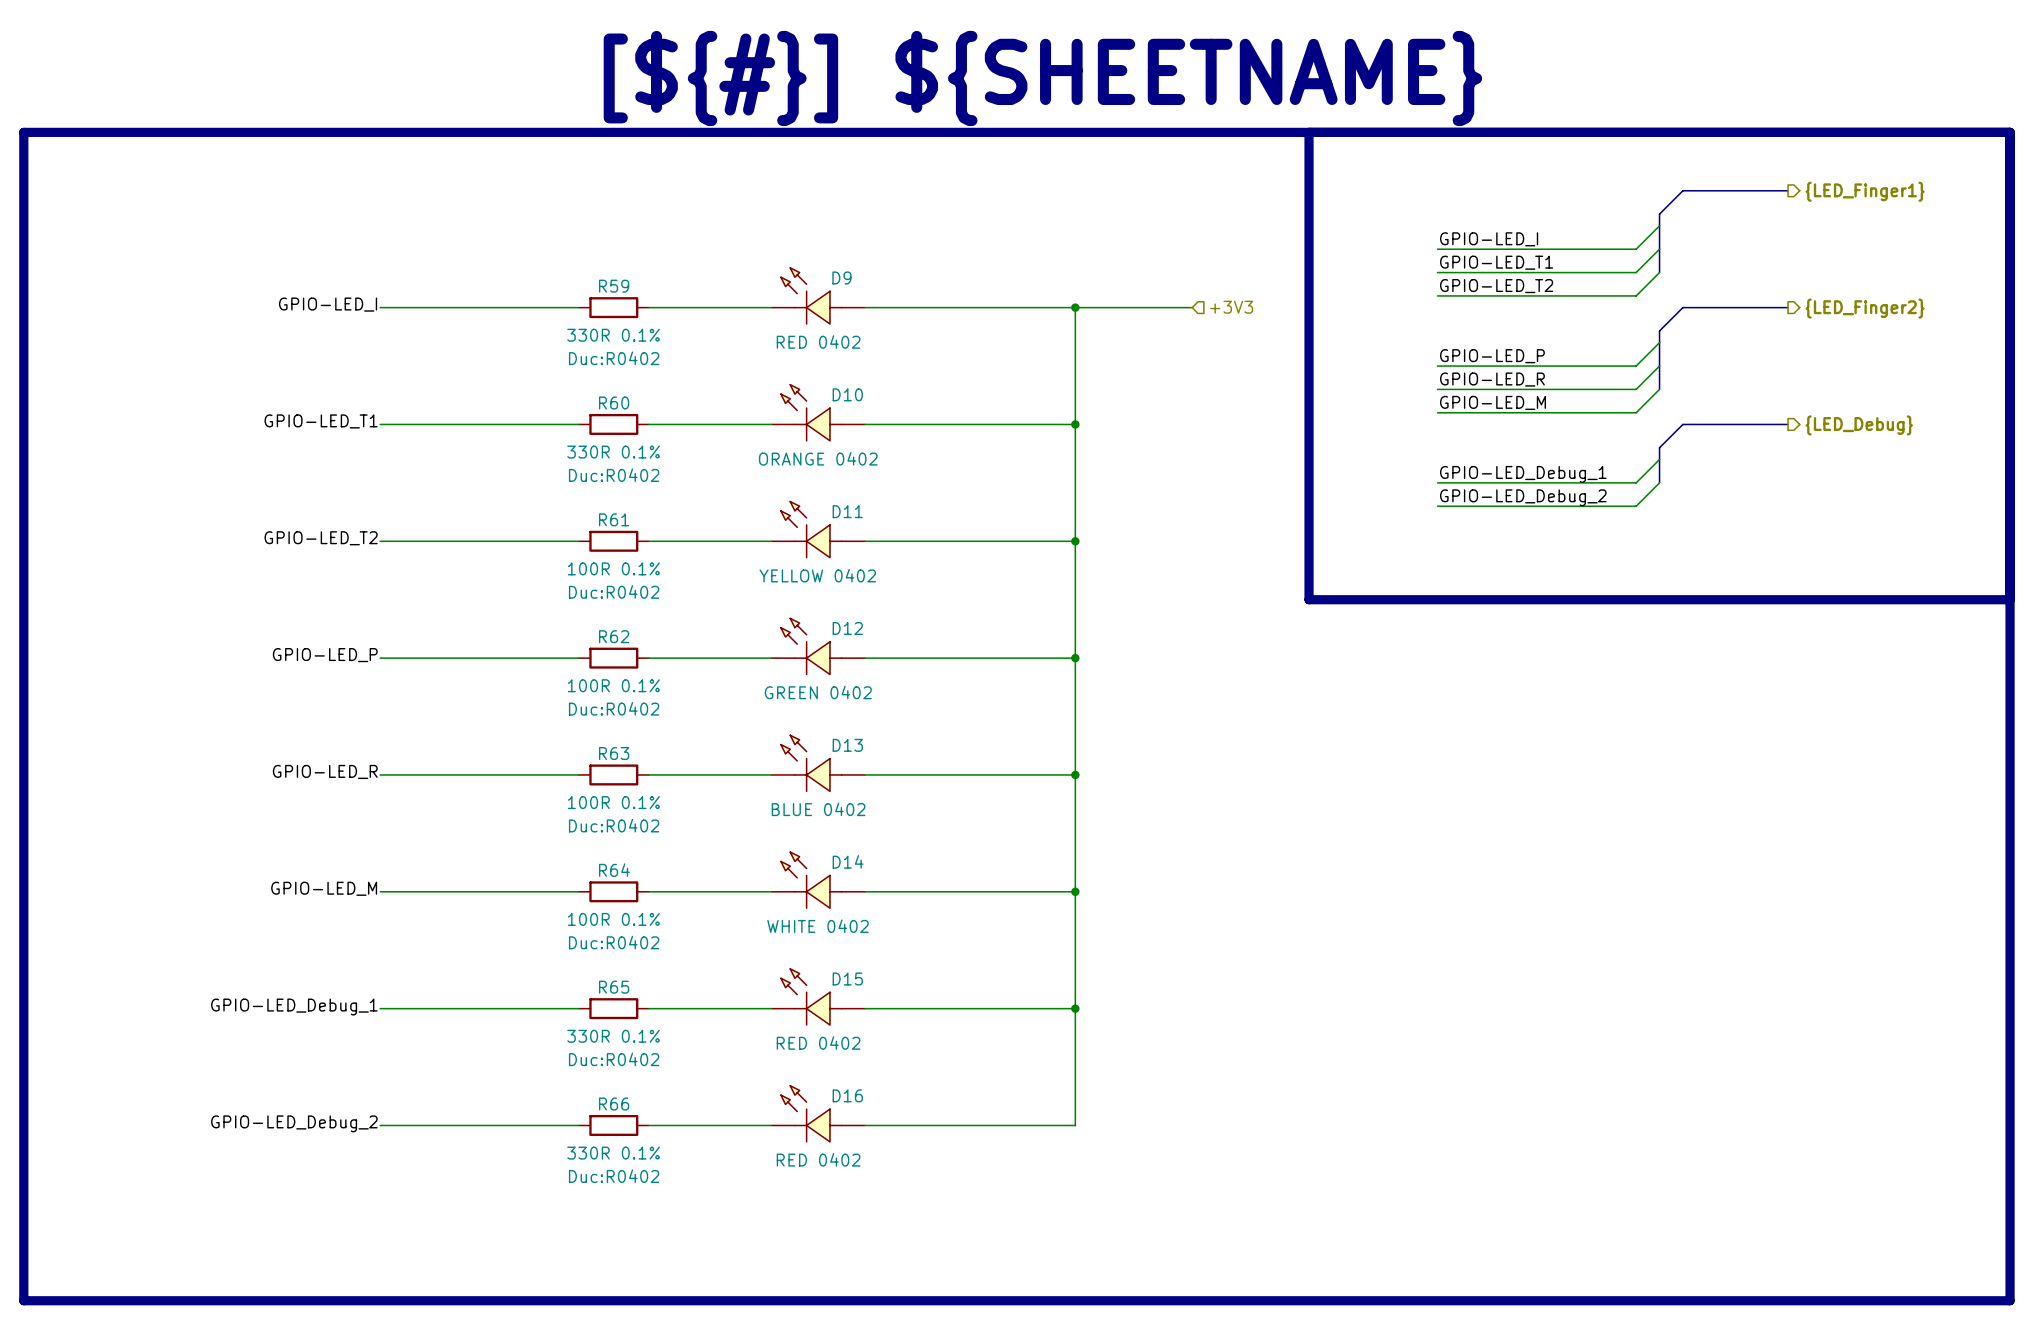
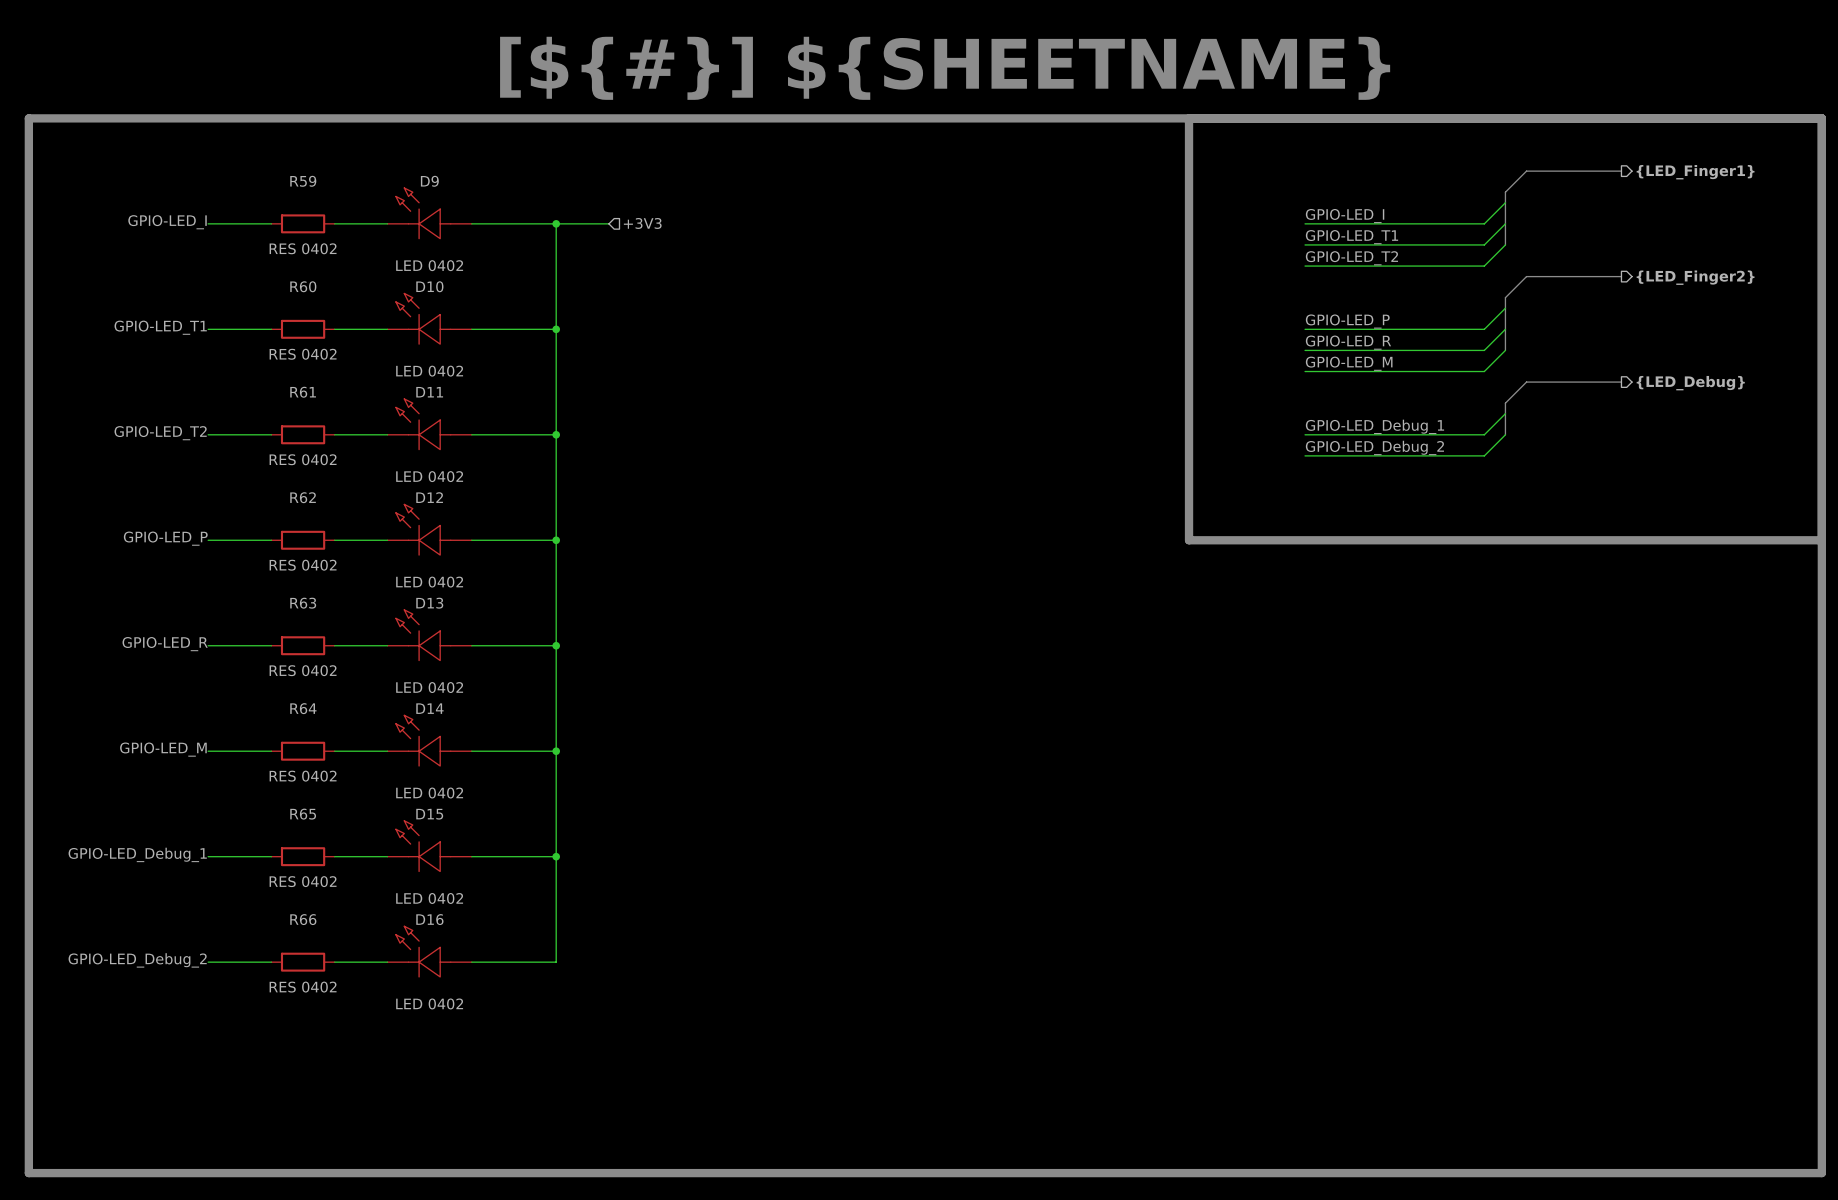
hierarchical label: none -> +3V3 (642, 223)
wire: none -> (208, 223) (271, 223)
wire: none -> (334, 223) (387, 223)
wire: none -> (471, 223) (608, 223)
wire: none -> (556, 223) (556, 962) (471, 962)
junction: none -> (556, 223)
D9 name position: D9 (841, 277) -> D9 (429, 181)
R59 name position: R59 (614, 286) -> R59 (303, 181)
D9 position: (818, 295) -> (429, 213)
label position: GPIO-LED_I (328, 304) -> GPIO-LED_I (167, 222)
wire: (380, 307) (578, 307) -> none
R59 position: (613, 307) -> (303, 223)
wire: (648, 307) (771, 307) -> none
wire: (865, 307) (1192, 307) -> none
wire: (1075, 307) (1075, 1125) (865, 1125) -> none
junction: (1075, 307) -> none
hierarchical label: +3V3 (1231, 307) -> none
R59 value: 330R 0.1% (613, 335) -> RES 0402 (303, 248)
D9 value: RED 0402 (818, 341) -> LED 0402 (429, 265)
R59 text: Duc:R0402 (614, 358) -> none
wire: none -> (208, 329) (271, 329)
wire: none -> (334, 329) (387, 329)
wire: none -> (471, 329) (556, 329)
junction: none -> (556, 329)
D10 name position: D10 (847, 394) -> D10 (429, 286)
R60 name position: R60 (614, 403) -> R60 (303, 286)
D10 position: (818, 412) -> (429, 318)
label position: GPIO-LED_T1 (321, 421) -> GPIO-LED_T1 (160, 327)
wire: (380, 424) (578, 424) -> none
R60 position: (613, 424) -> (303, 329)
wire: (648, 424) (771, 424) -> none
wire: (865, 424) (1075, 424) -> none
junction: (1075, 424) -> none
R60 value: 330R 0.1% (613, 452) -> RES 0402 (303, 354)
D10 value: ORANGE 0402 (818, 458) -> LED 0402 (429, 371)
R60 text: Duc:R0402 (614, 475) -> none
wire: none -> (208, 434) (271, 434)
wire: none -> (334, 434) (387, 434)
wire: none -> (471, 434) (556, 434)
junction: none -> (556, 434)
D11 name position: D11 (847, 511) -> D11 (429, 392)
R61 name position: R61 (614, 519) -> R61 (303, 392)
D11 position: (818, 529) -> (429, 424)
label position: GPIO-LED_T2 (321, 538) -> GPIO-LED_T2 (160, 433)
wire: (380, 541) (578, 541) -> none
R61 position: (613, 541) -> (303, 434)
wire: (648, 541) (771, 541) -> none
wire: (865, 541) (1075, 541) -> none
junction: (1075, 541) -> none
R61 value: 100R 0.1% (613, 568) -> RES 0402 (303, 459)
D11 value: YELLOW 0402 (817, 575) -> LED 0402 (429, 476)
R61 text: Duc:R0402 (614, 591) -> none
wire: none -> (208, 540) (271, 540)
wire: none -> (334, 540) (387, 540)
wire: none -> (471, 540) (556, 540)
junction: none -> (556, 540)
D12 name position: D12 (847, 628) -> D12 (429, 497)
R62 name position: R62 (614, 636) -> R62 (303, 497)
D12 position: (818, 646) -> (429, 529)
label position: GPIO-LED_P (325, 655) -> GPIO-LED_P (165, 538)
wire: (380, 658) (578, 658) -> none
R62 position: (613, 658) -> (303, 540)
wire: (648, 658) (771, 658) -> none
wire: (865, 658) (1075, 658) -> none
junction: (1075, 658) -> none
R62 value: 100R 0.1% (613, 685) -> RES 0402 (303, 565)
D12 value: GREEN 0402 (818, 692) -> LED 0402 (429, 582)
R62 text: Duc:R0402 (614, 708) -> none
wire: none -> (208, 645) (271, 645)
wire: none -> (334, 645) (387, 645)
wire: none -> (471, 645) (556, 645)
junction: none -> (556, 645)
D13 name position: D13 (847, 745) -> D13 (429, 603)
R63 name position: R63 (614, 753) -> R63 (303, 603)
D13 position: (818, 763) -> (429, 635)
label position: GPIO-LED_R (325, 771) -> GPIO-LED_R (165, 644)
wire: (380, 774) (578, 774) -> none
R63 position: (613, 774) -> (303, 645)
wire: (648, 774) (771, 774) -> none
wire: (865, 774) (1075, 774) -> none
junction: (1075, 774) -> none
R63 value: 100R 0.1% (613, 802) -> RES 0402 (303, 670)
D13 value: BLUE 0402 (818, 809) -> LED 0402 (429, 687)
R63 text: Duc:R0402 (614, 825) -> none
wire: none -> (208, 751) (271, 751)
wire: none -> (334, 751) (387, 751)
wire: none -> (471, 751) (556, 751)
junction: none -> (556, 751)
D14 name position: D14 (848, 861) -> D14 (429, 708)
R64 name position: R64 (614, 870) -> R64 (303, 708)
D14 position: (818, 880) -> (429, 740)
label position: GPIO-LED_M (324, 888) -> GPIO-LED_M (163, 749)
wire: (380, 891) (578, 891) -> none
R64 position: (613, 891) -> (303, 751)
wire: (648, 891) (771, 891) -> none
wire: (865, 891) (1075, 891) -> none
junction: (1075, 891) -> none
R64 value: 100R 0.1% (613, 919) -> RES 0402 (303, 776)
D14 value: WHITE 0402 (818, 926) -> LED 0402 (429, 793)
R64 text: Duc:R0402 (614, 942) -> none
wire: none -> (208, 856) (271, 856)
wire: none -> (334, 856) (387, 856)
wire: none -> (471, 856) (556, 856)
junction: none -> (556, 856)
D15 name position: D15 (847, 979) -> D15 (429, 814)
R65 name position: R65 (614, 987) -> R65 (303, 814)
D15 position: (818, 996) -> (429, 846)
label position: GPIO-LED_Debug_1 (294, 1007) -> GPIO-LED_Debug_1 (137, 854)
wire: (380, 1008) (578, 1008) -> none
R65 position: (613, 1008) -> (303, 856)
wire: (648, 1008) (771, 1008) -> none
wire: (865, 1008) (1075, 1008) -> none
junction: (1075, 1008) -> none
R65 value: 330R 0.1% (613, 1036) -> RES 0402 (303, 881)
D15 value: RED 0402 (818, 1042) -> LED 0402 (429, 898)
R65 text: Duc:R0402 (614, 1059) -> none
wire: none -> (208, 962) (271, 962)
wire: none -> (334, 962) (387, 962)
D16 name position: D16 (847, 1095) -> D16 (429, 919)
R66 name position: R66 (614, 1104) -> R66 (303, 919)
D16 position: (818, 1113) -> (429, 951)
label position: GPIO-LED_Debug_2 (294, 1123) -> GPIO-LED_Debug_2 (137, 960)
wire: (380, 1125) (578, 1125) -> none
R66 position: (613, 1125) -> (303, 962)
wire: (648, 1125) (771, 1125) -> none
R66 value: 330R 0.1% (613, 1153) -> RES 0402 (303, 987)
D16 value: RED 0402 (818, 1159) -> LED 0402 (429, 1003)
R66 text: Duc:R0402 (614, 1176) -> none

